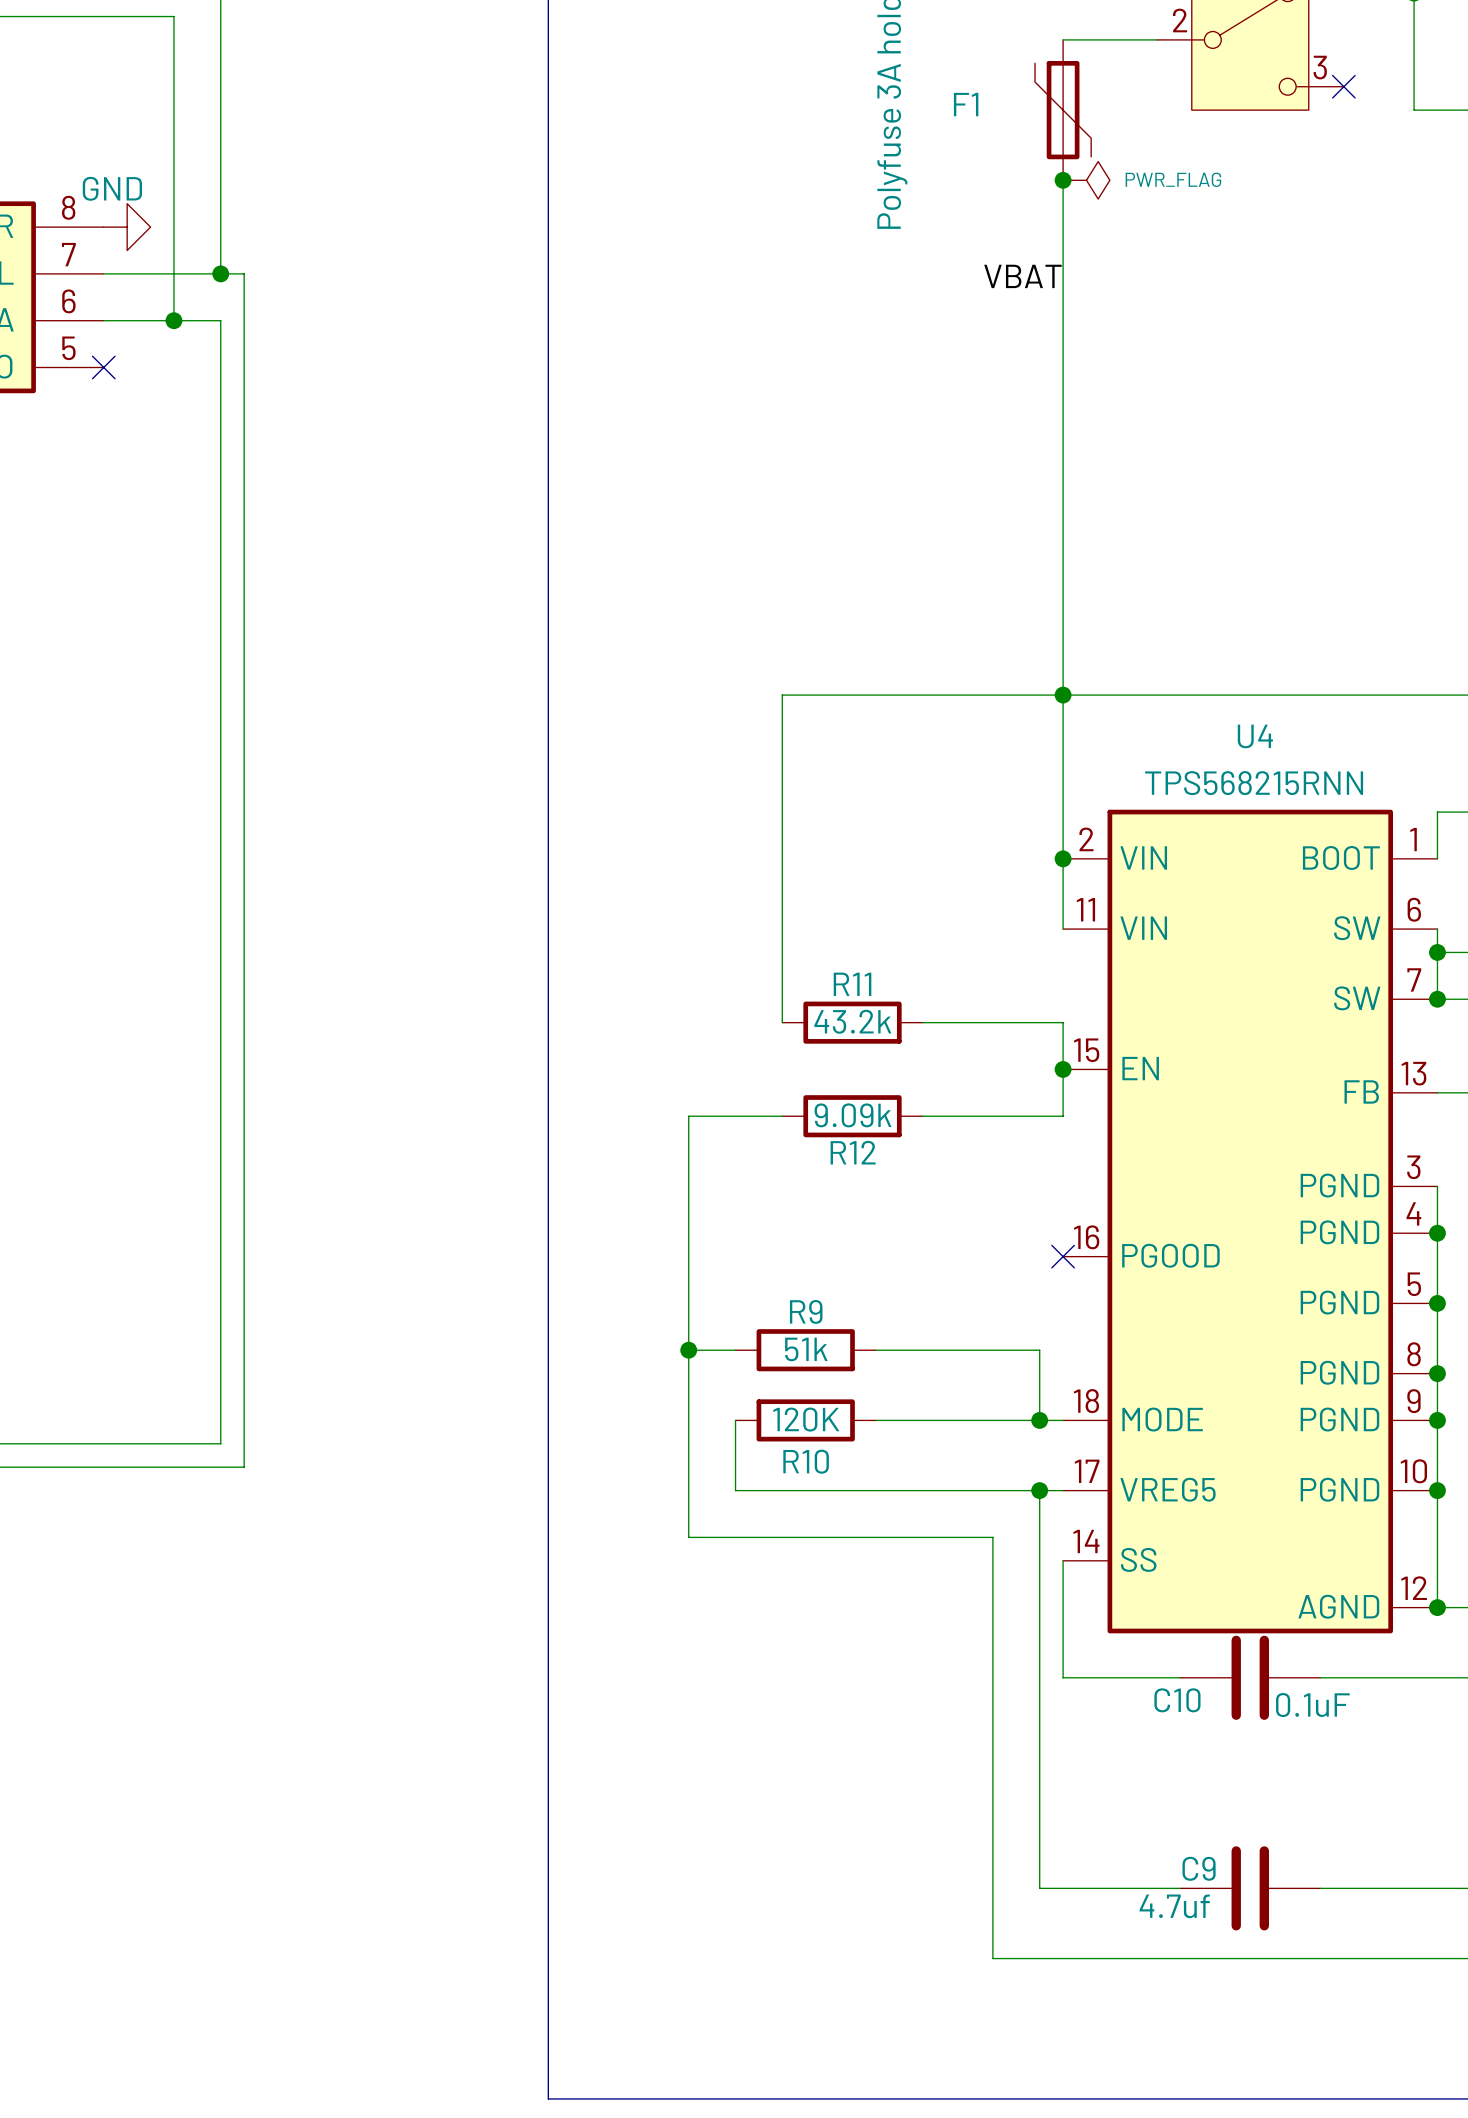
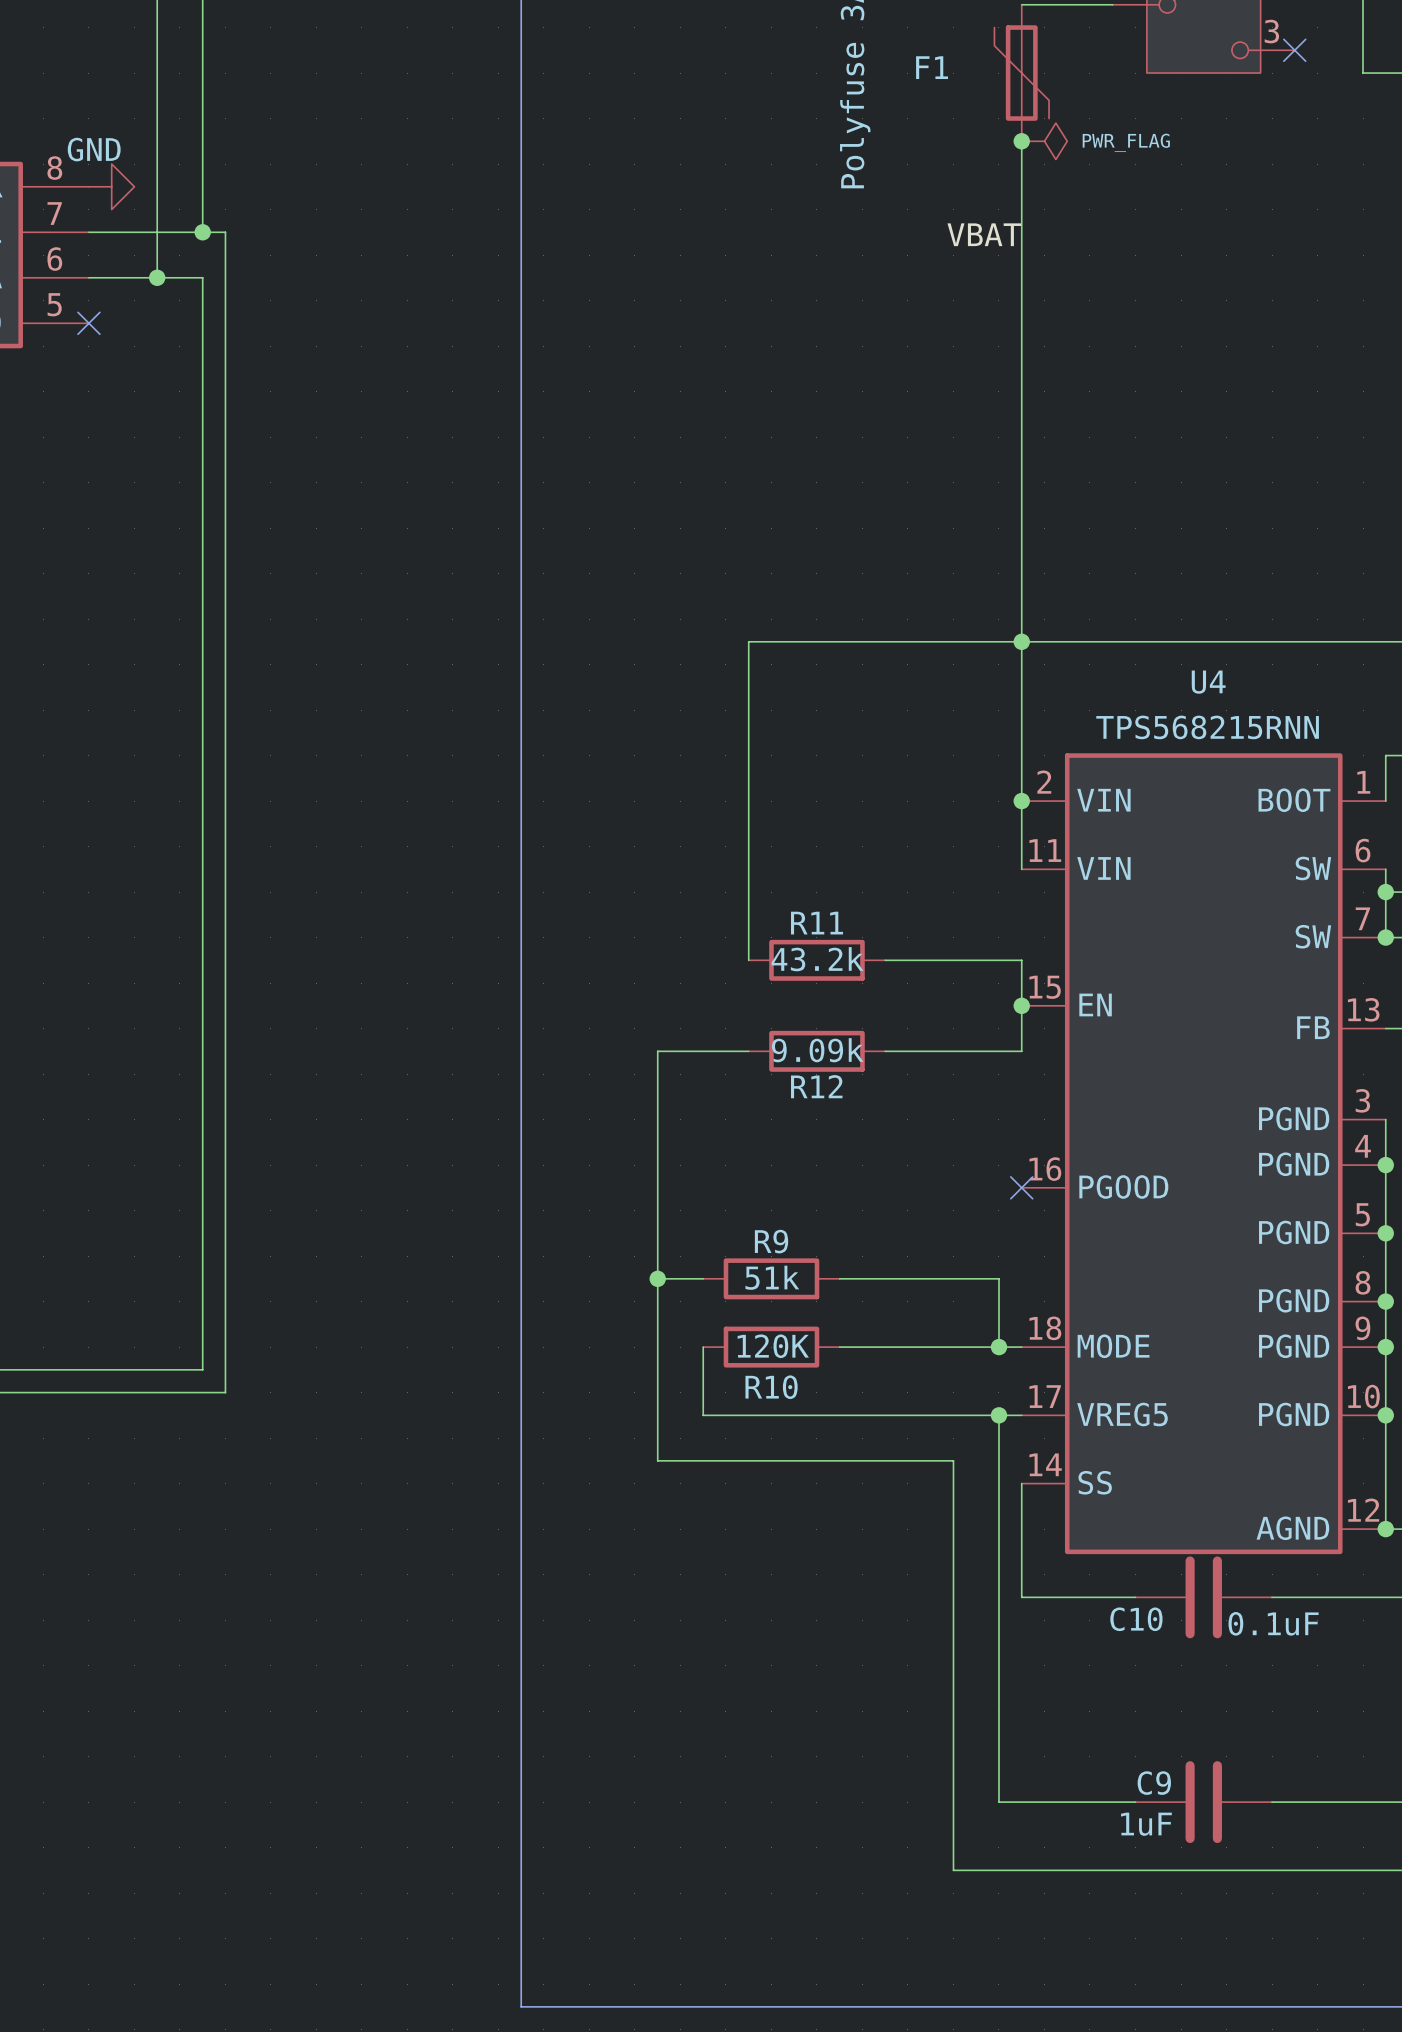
C9 value: 4.7uf (1174, 1906) -> 1uF (1146, 1824)

